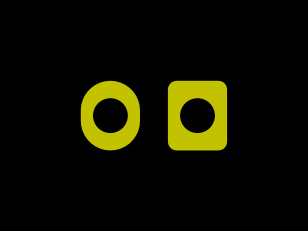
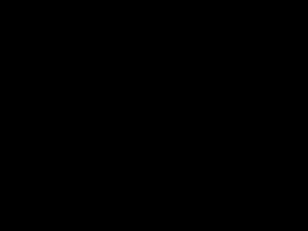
part: (153, 115) -> none

